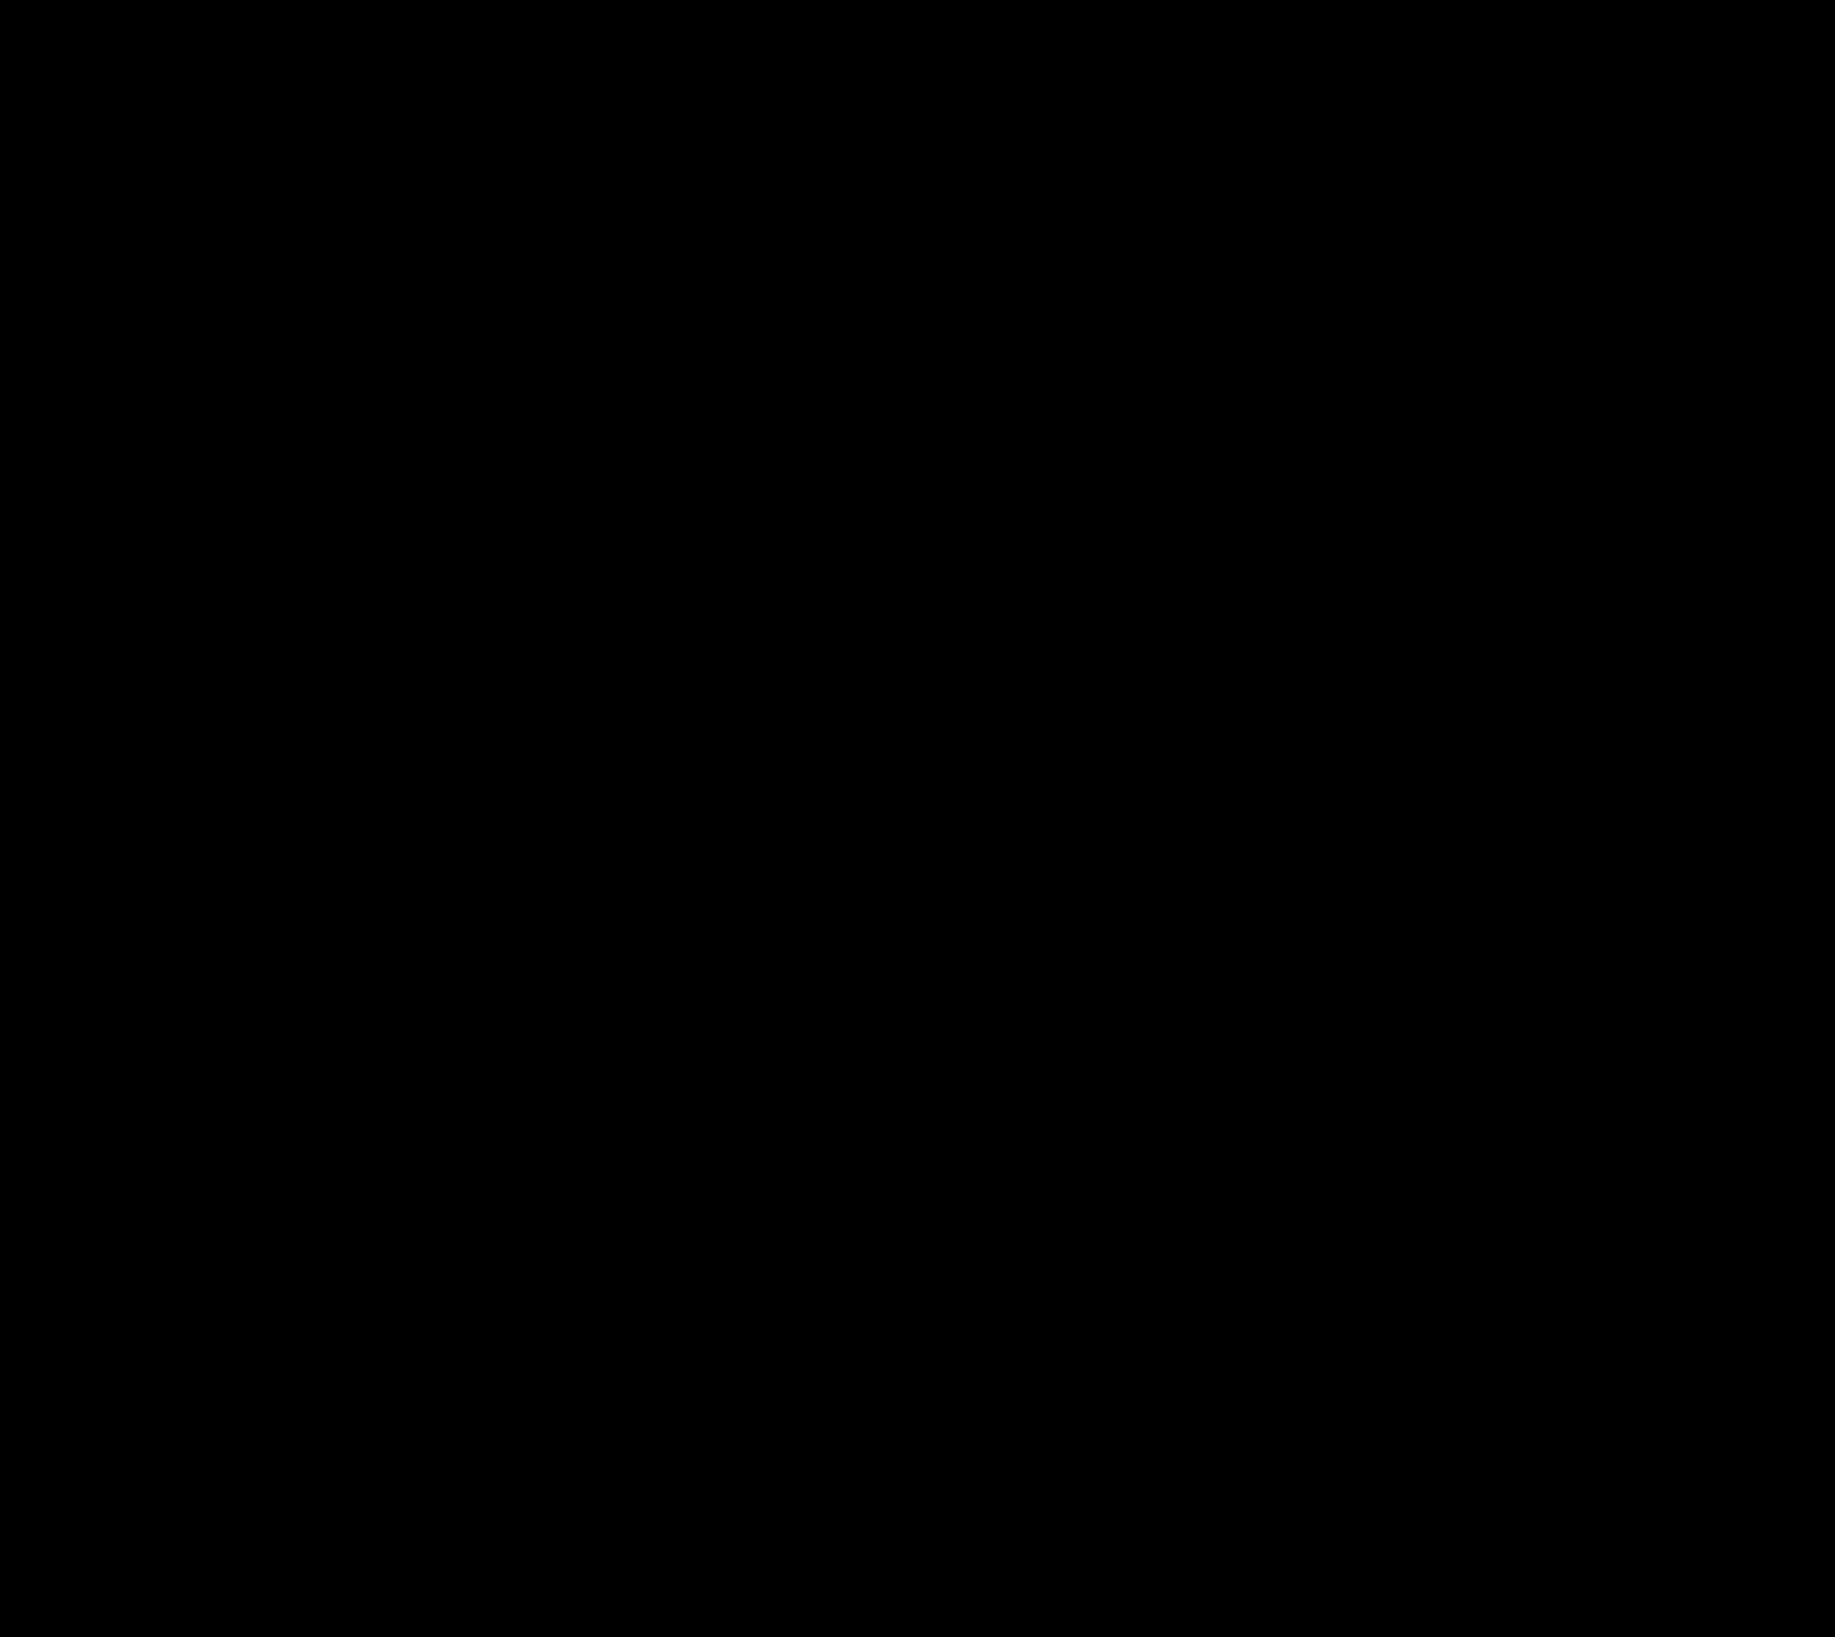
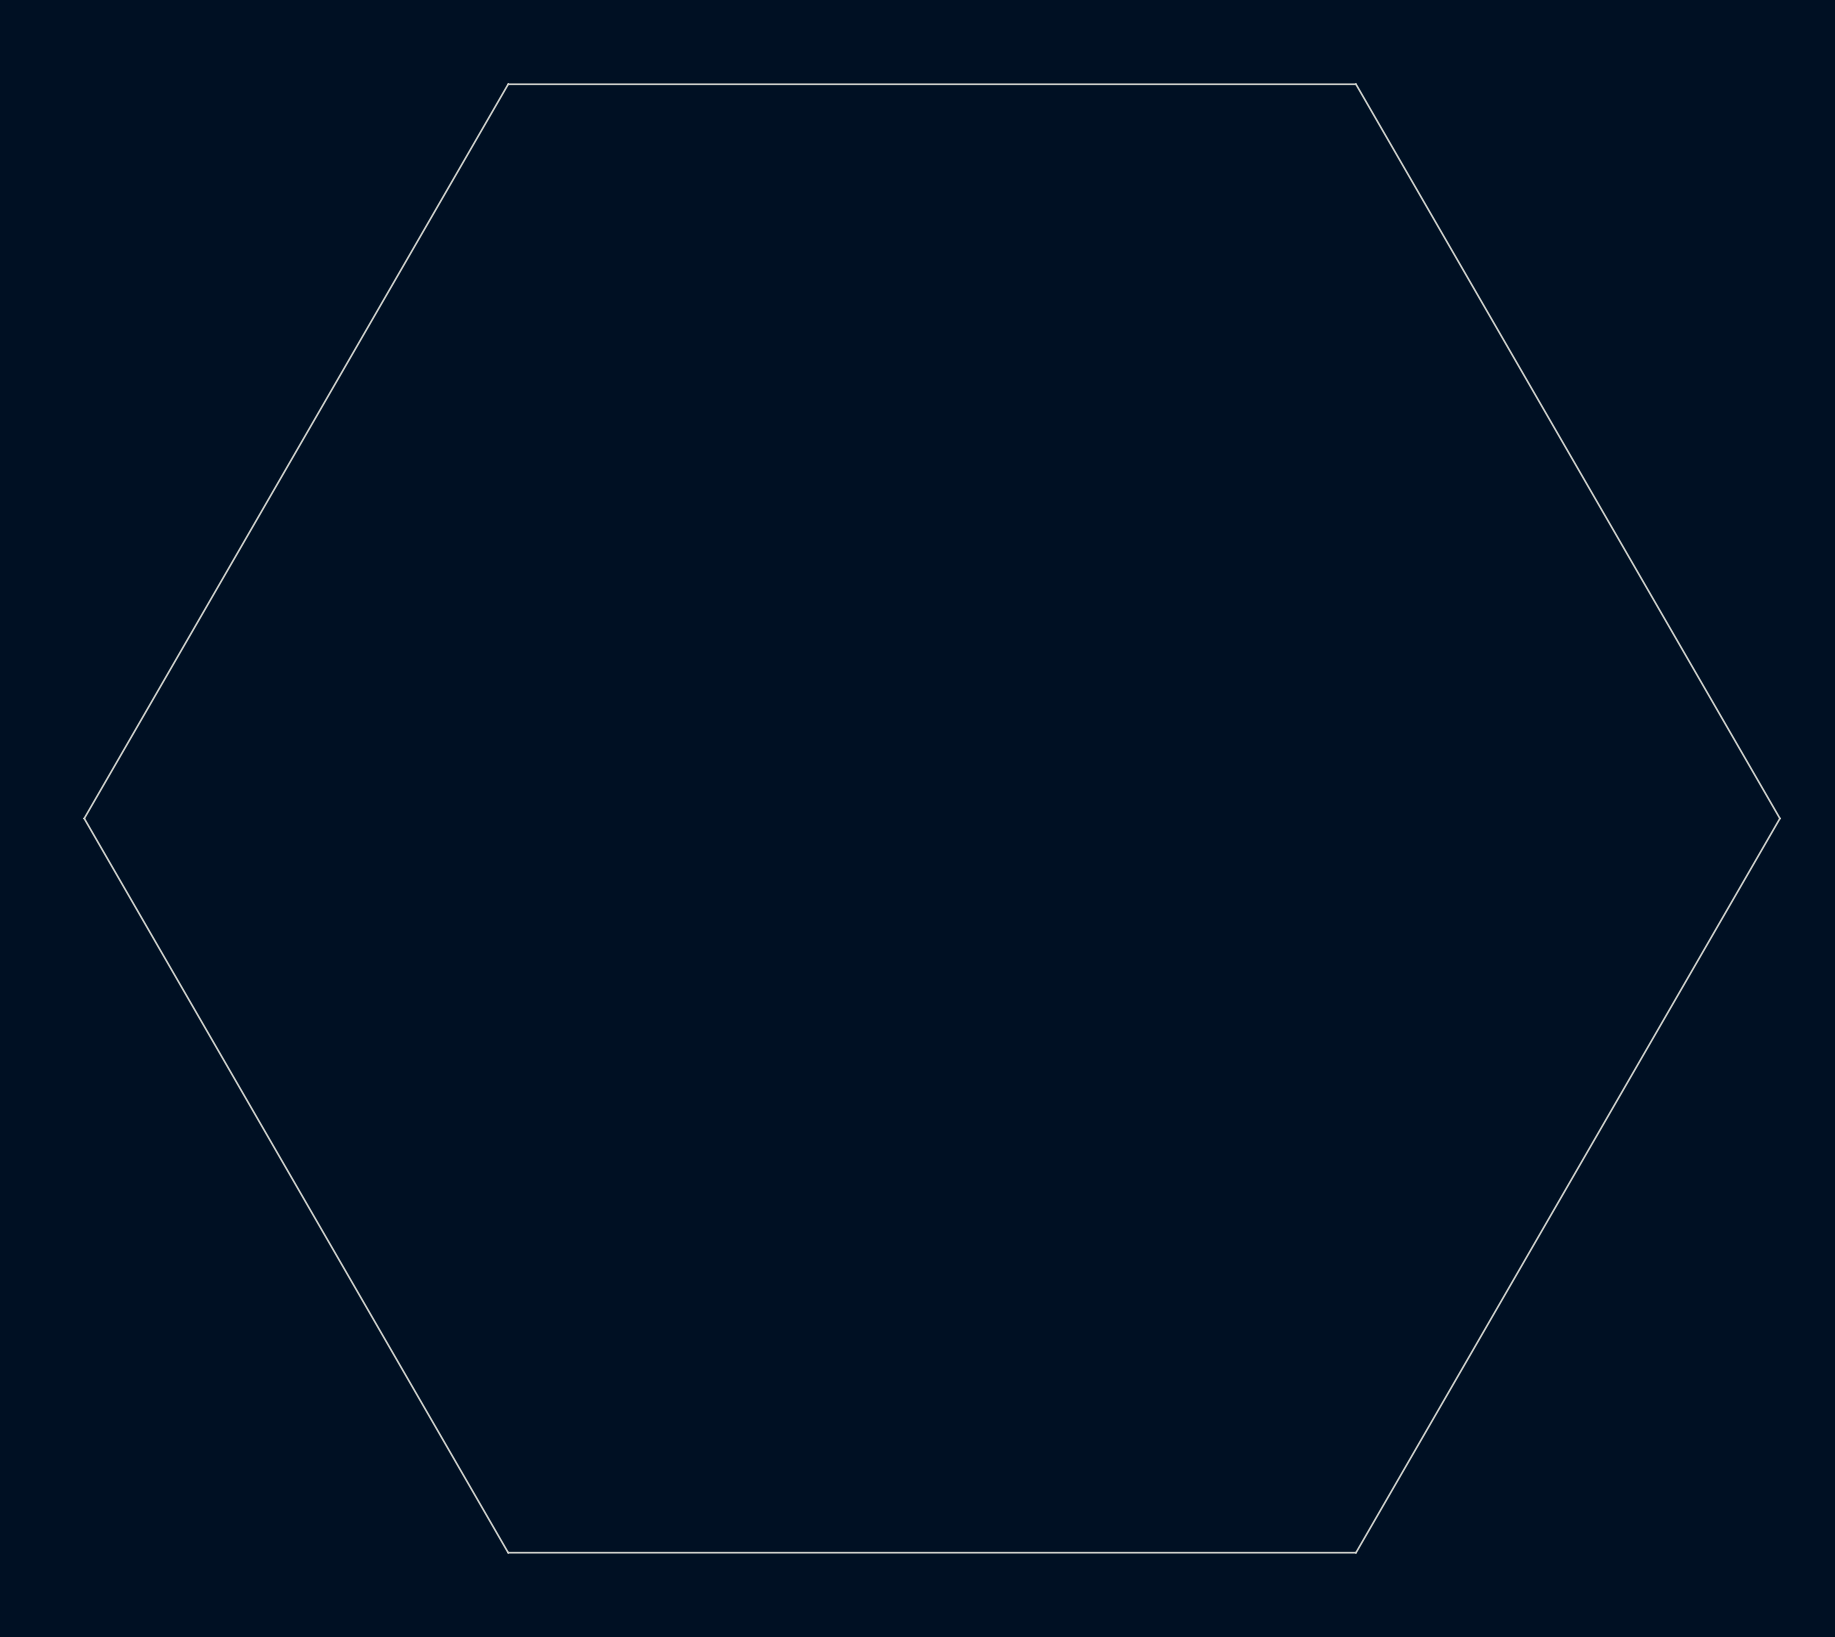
board edge: none -> (508, 84) (84, 818) (508, 1552) (1355, 1552) (1779, 818) (1355, 84) (508, 84)

